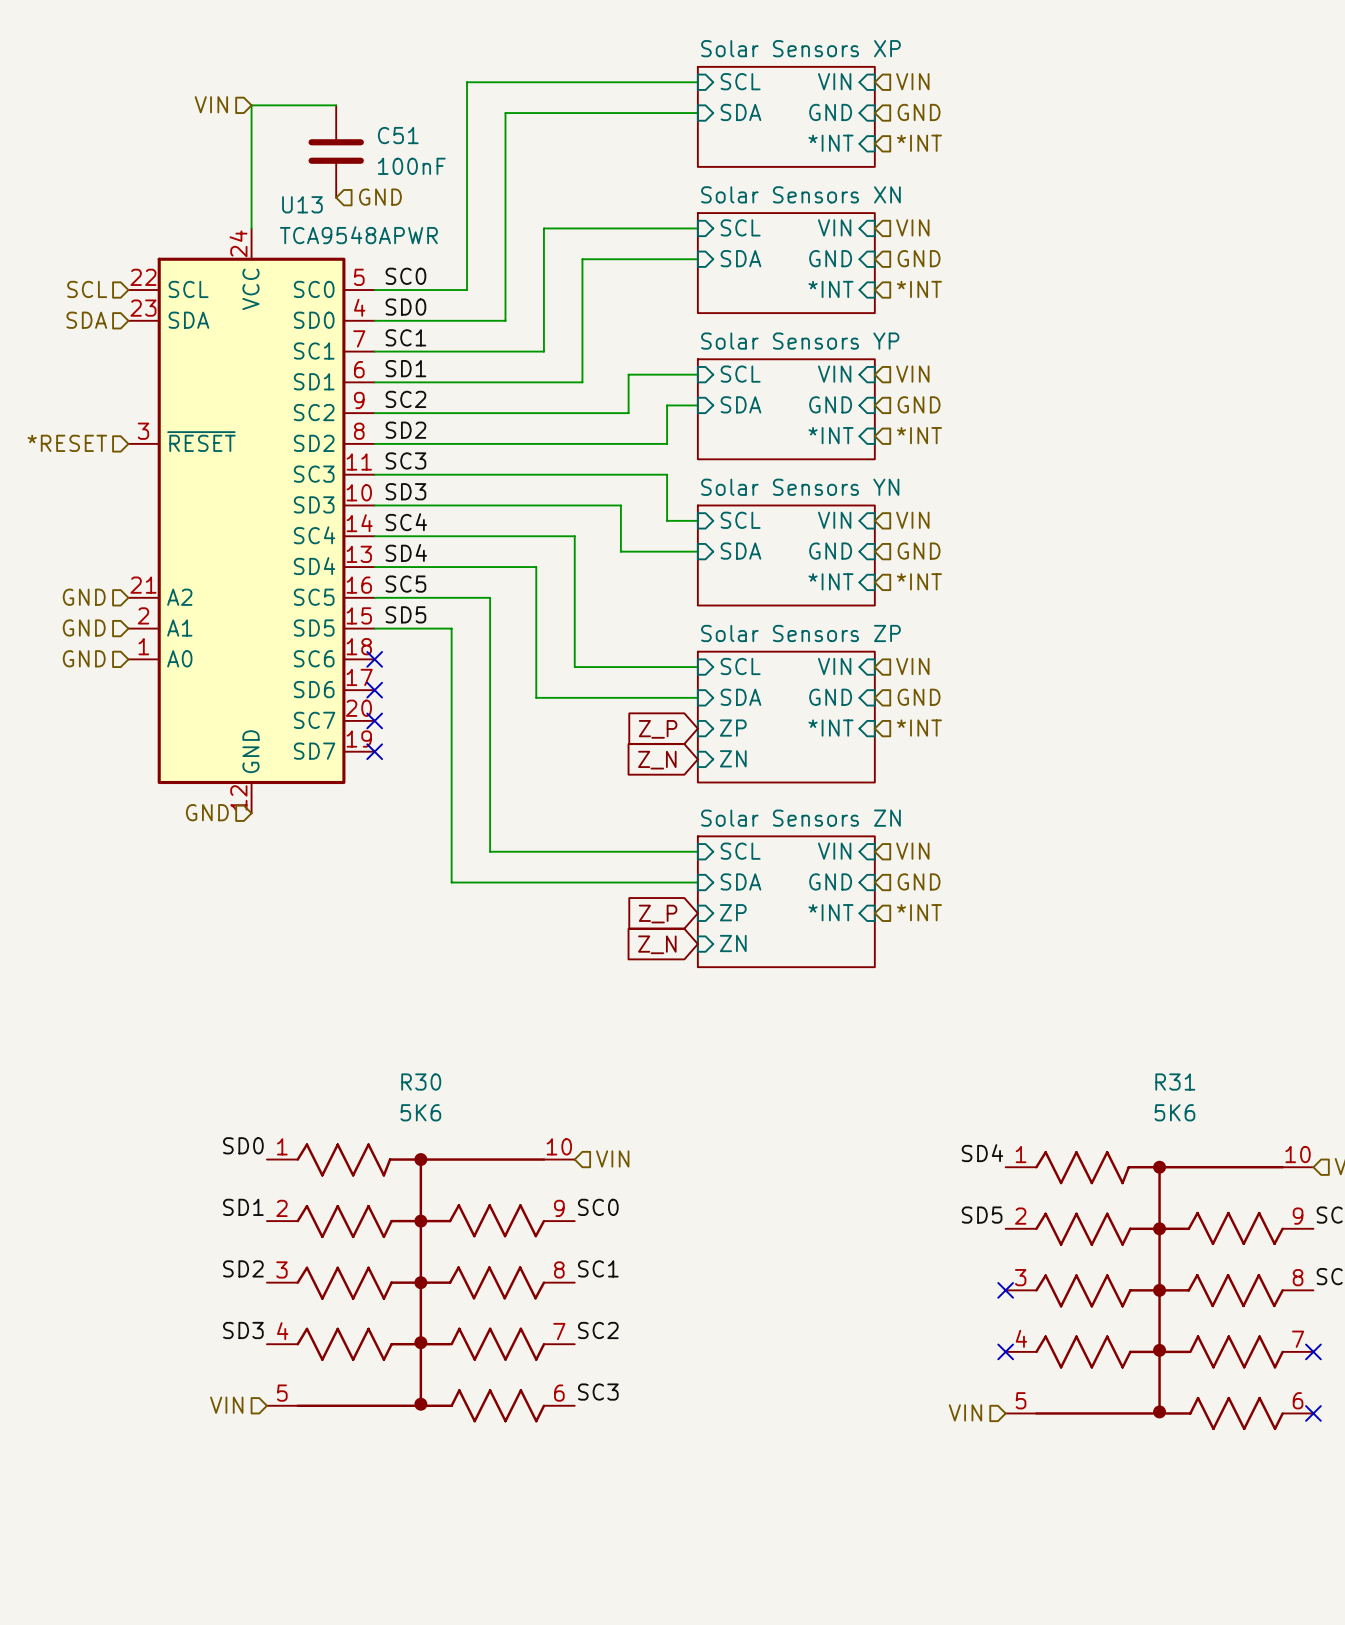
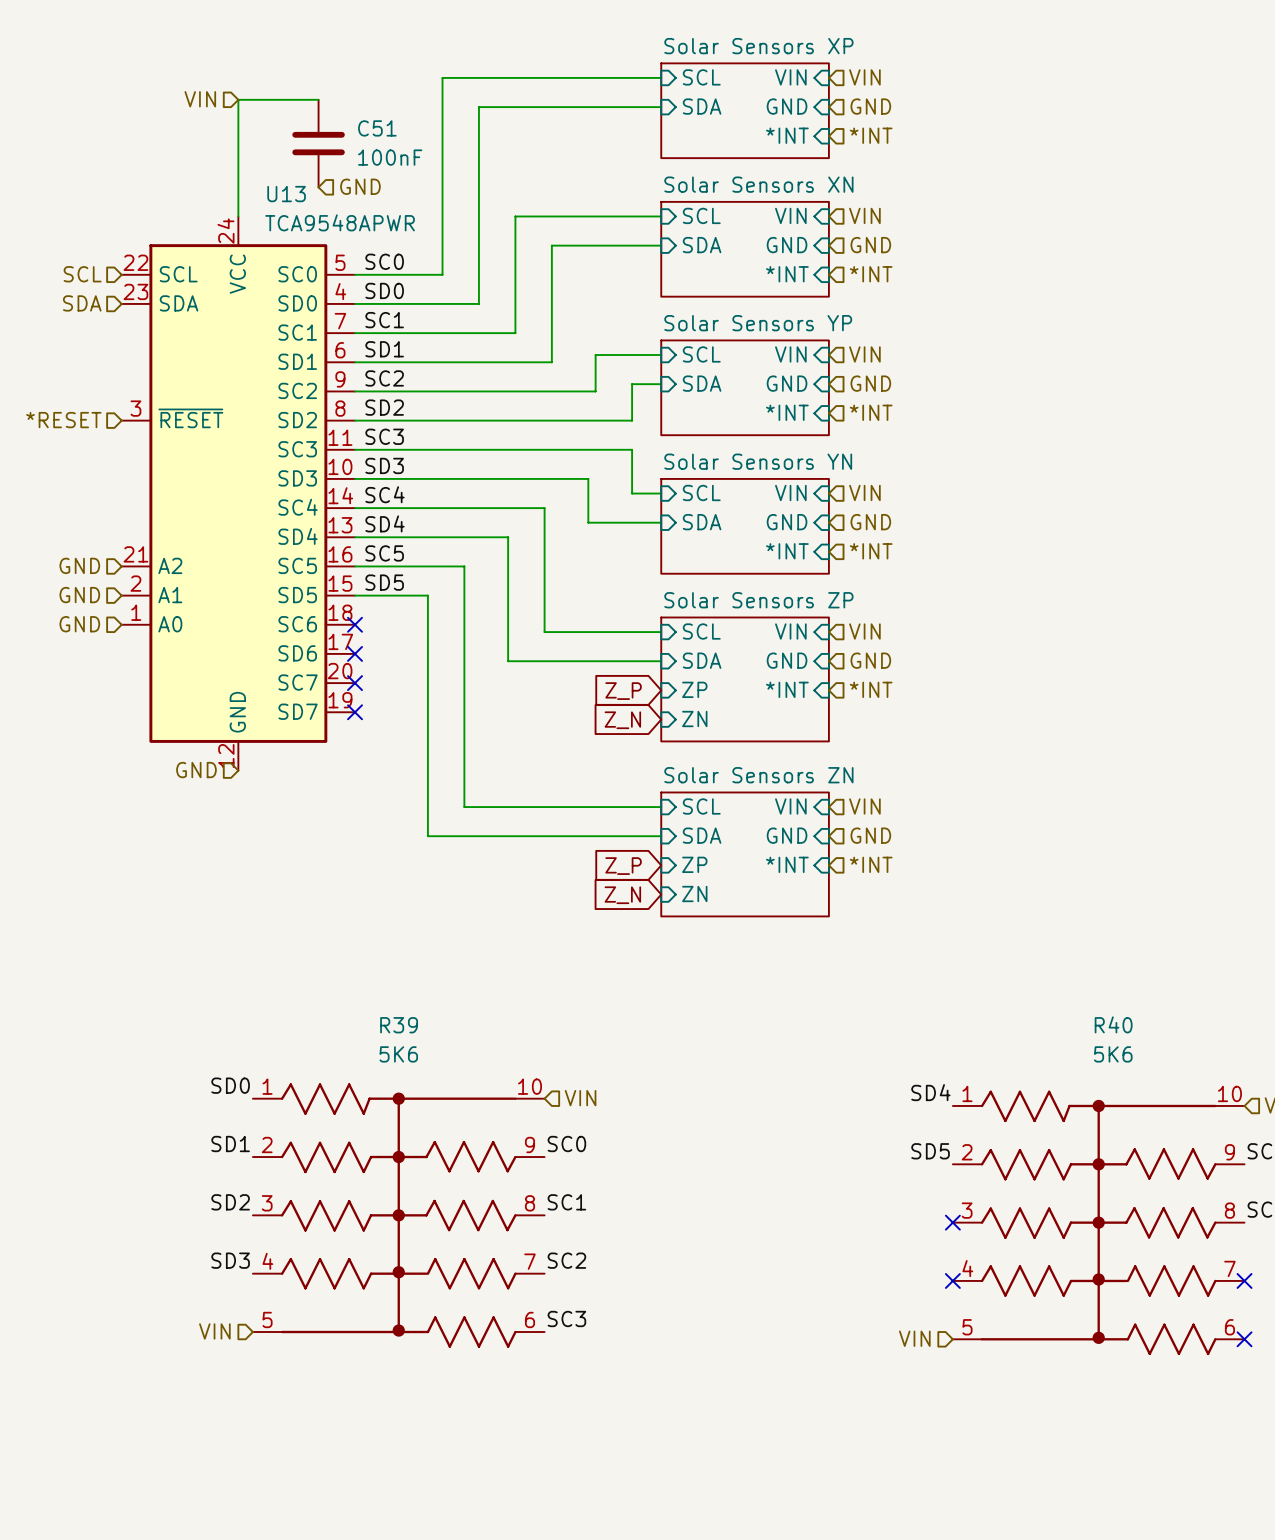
R30 name: R30 (421, 1082) -> R39 (399, 1025)
R31 name: R31 (1175, 1082) -> R40 (1113, 1024)

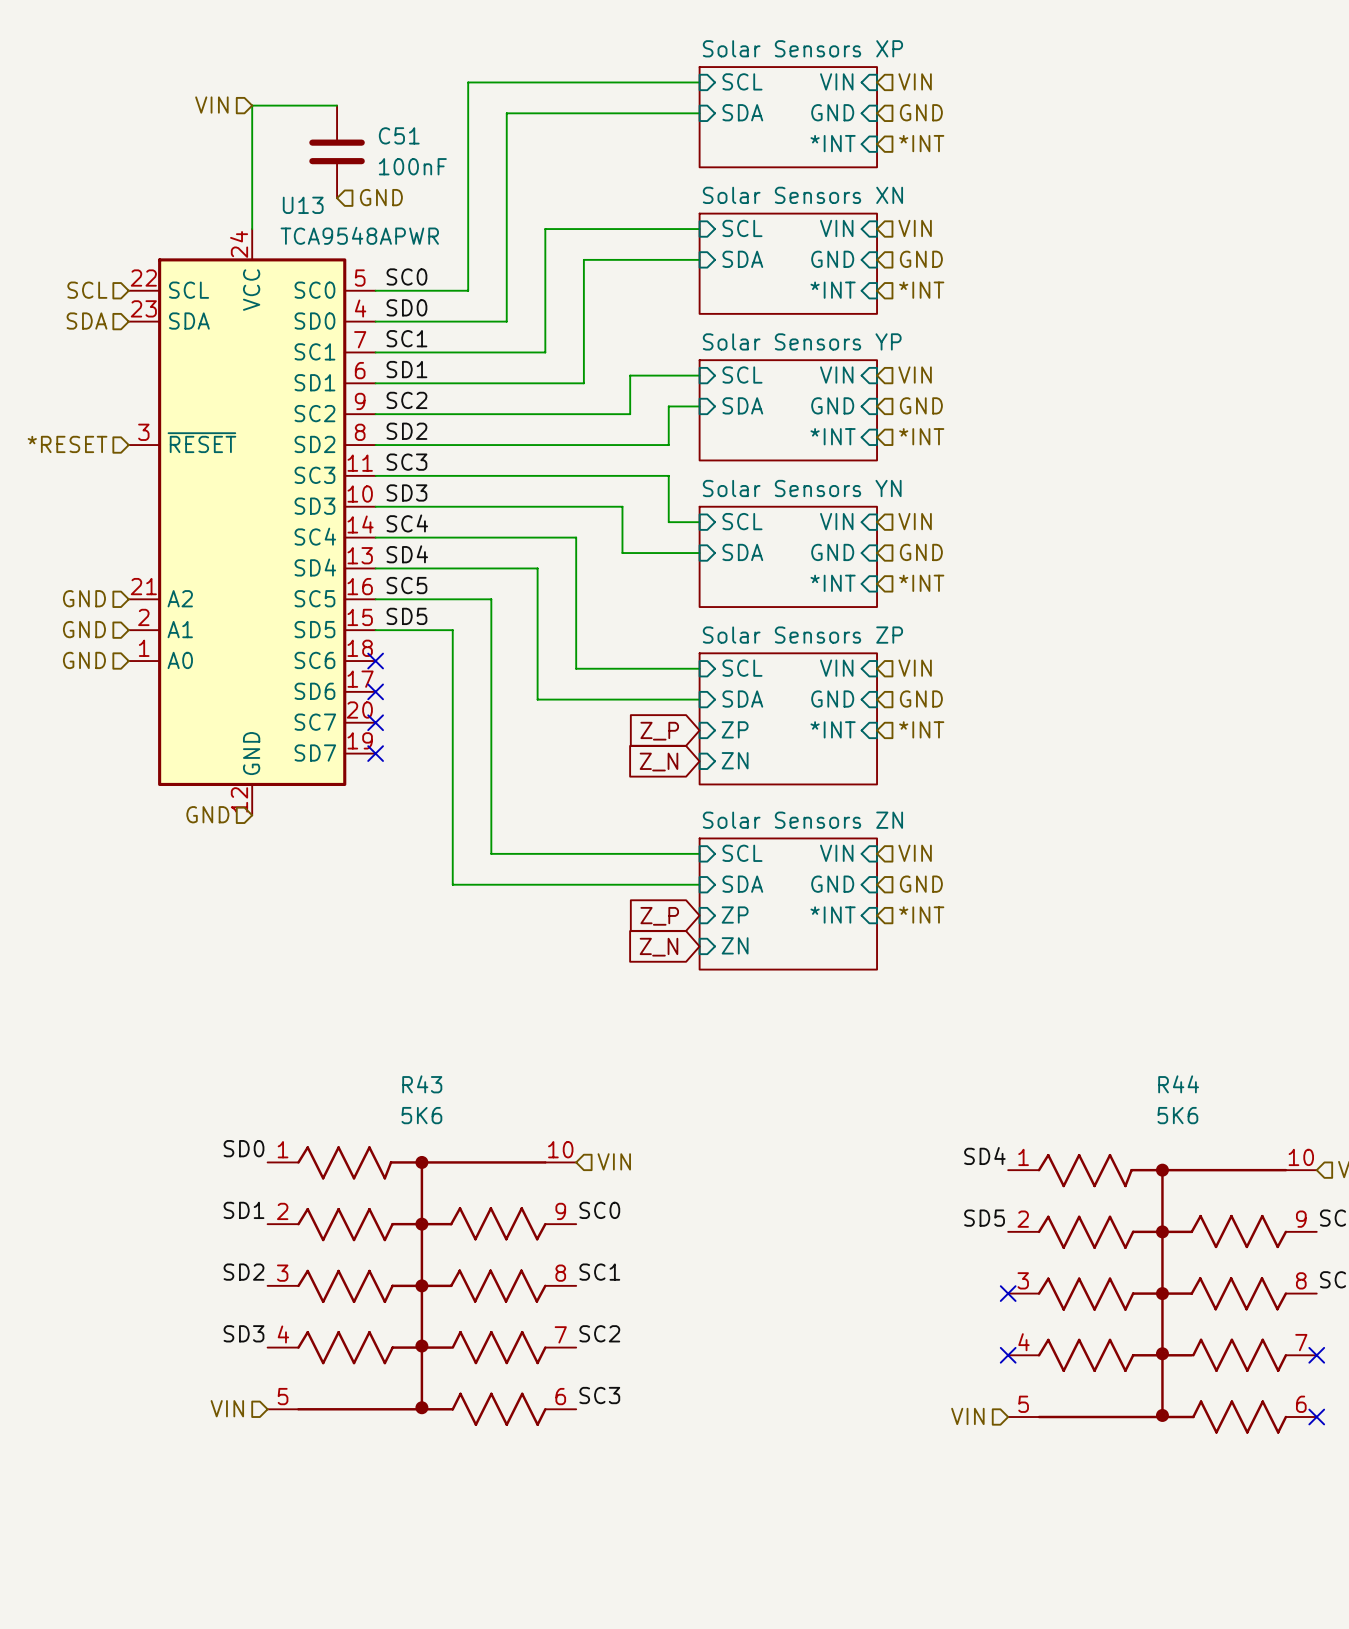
R40 name: R40 (1113, 1024) -> R44 (1178, 1084)
R39 name: R39 (399, 1025) -> R43 (422, 1084)

